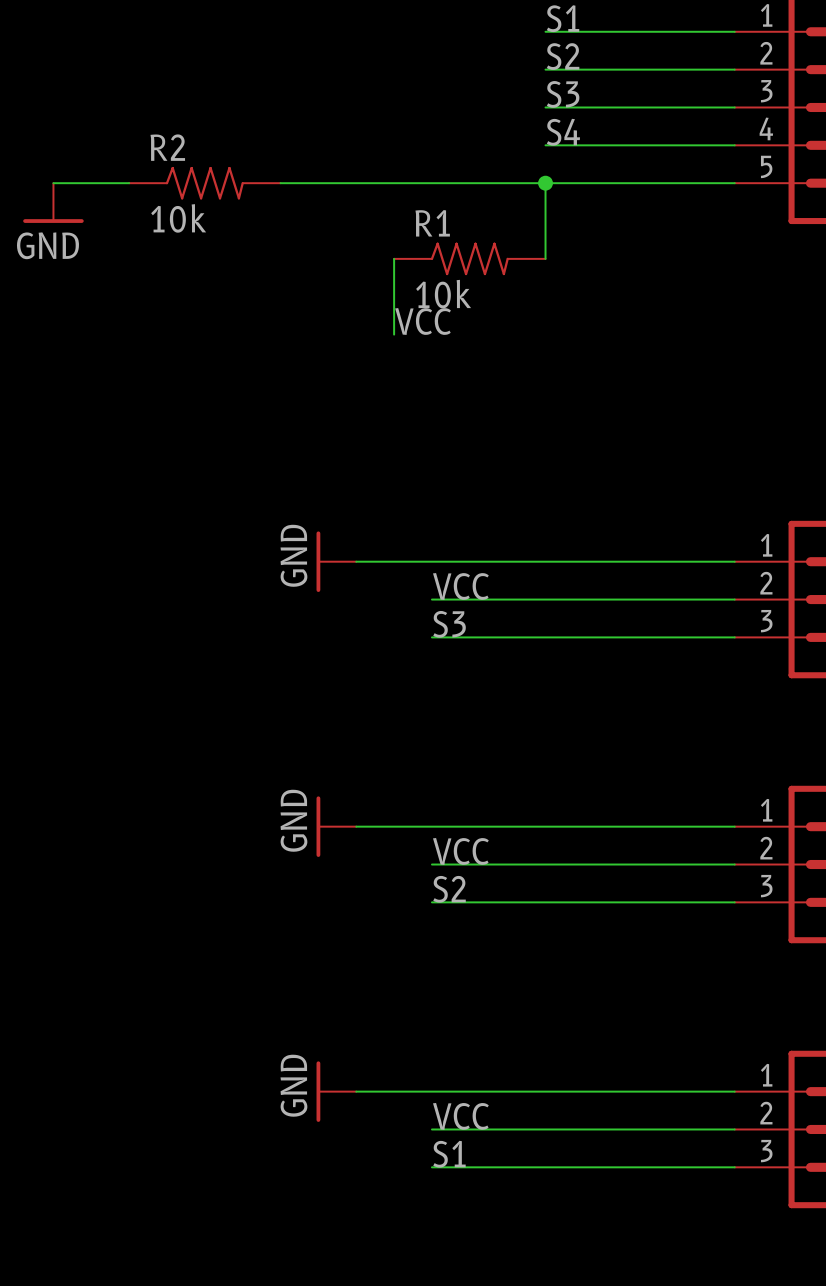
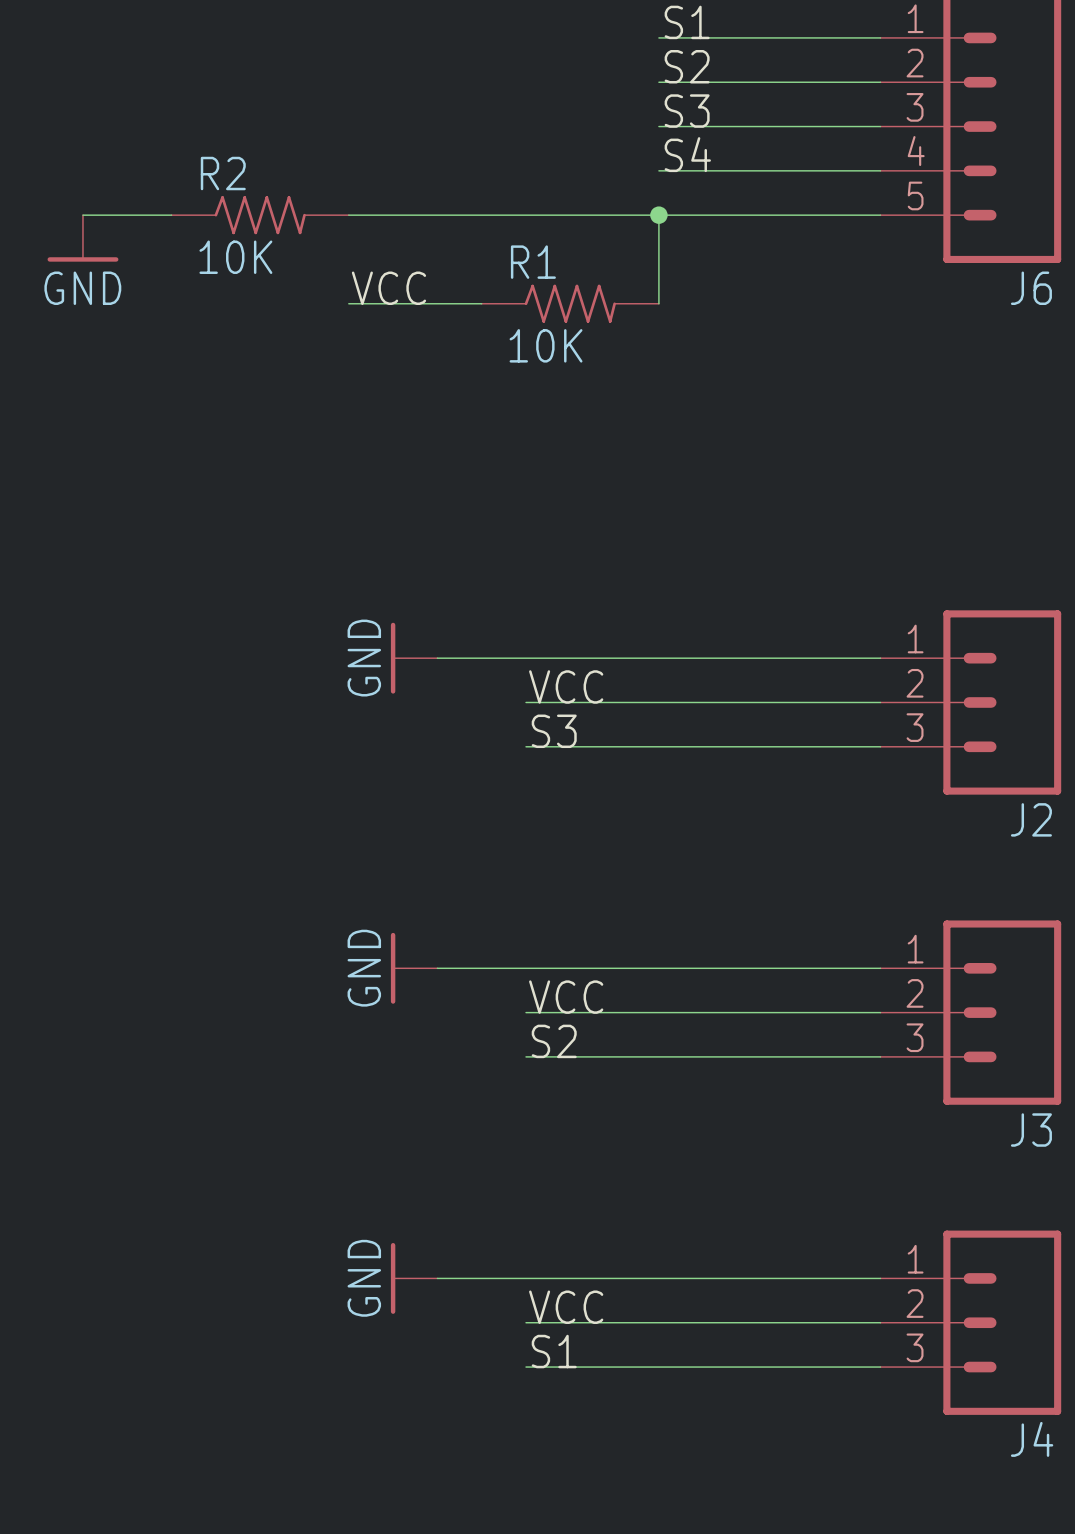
R2 value: 10k (178, 218) -> 10K (235, 257)
wire: (394, 258) (394, 334) -> (481, 303) (348, 303)
R1 value: 10k (443, 294) -> 10K (546, 345)
label position: VCC (423, 321) -> VCC (388, 288)

